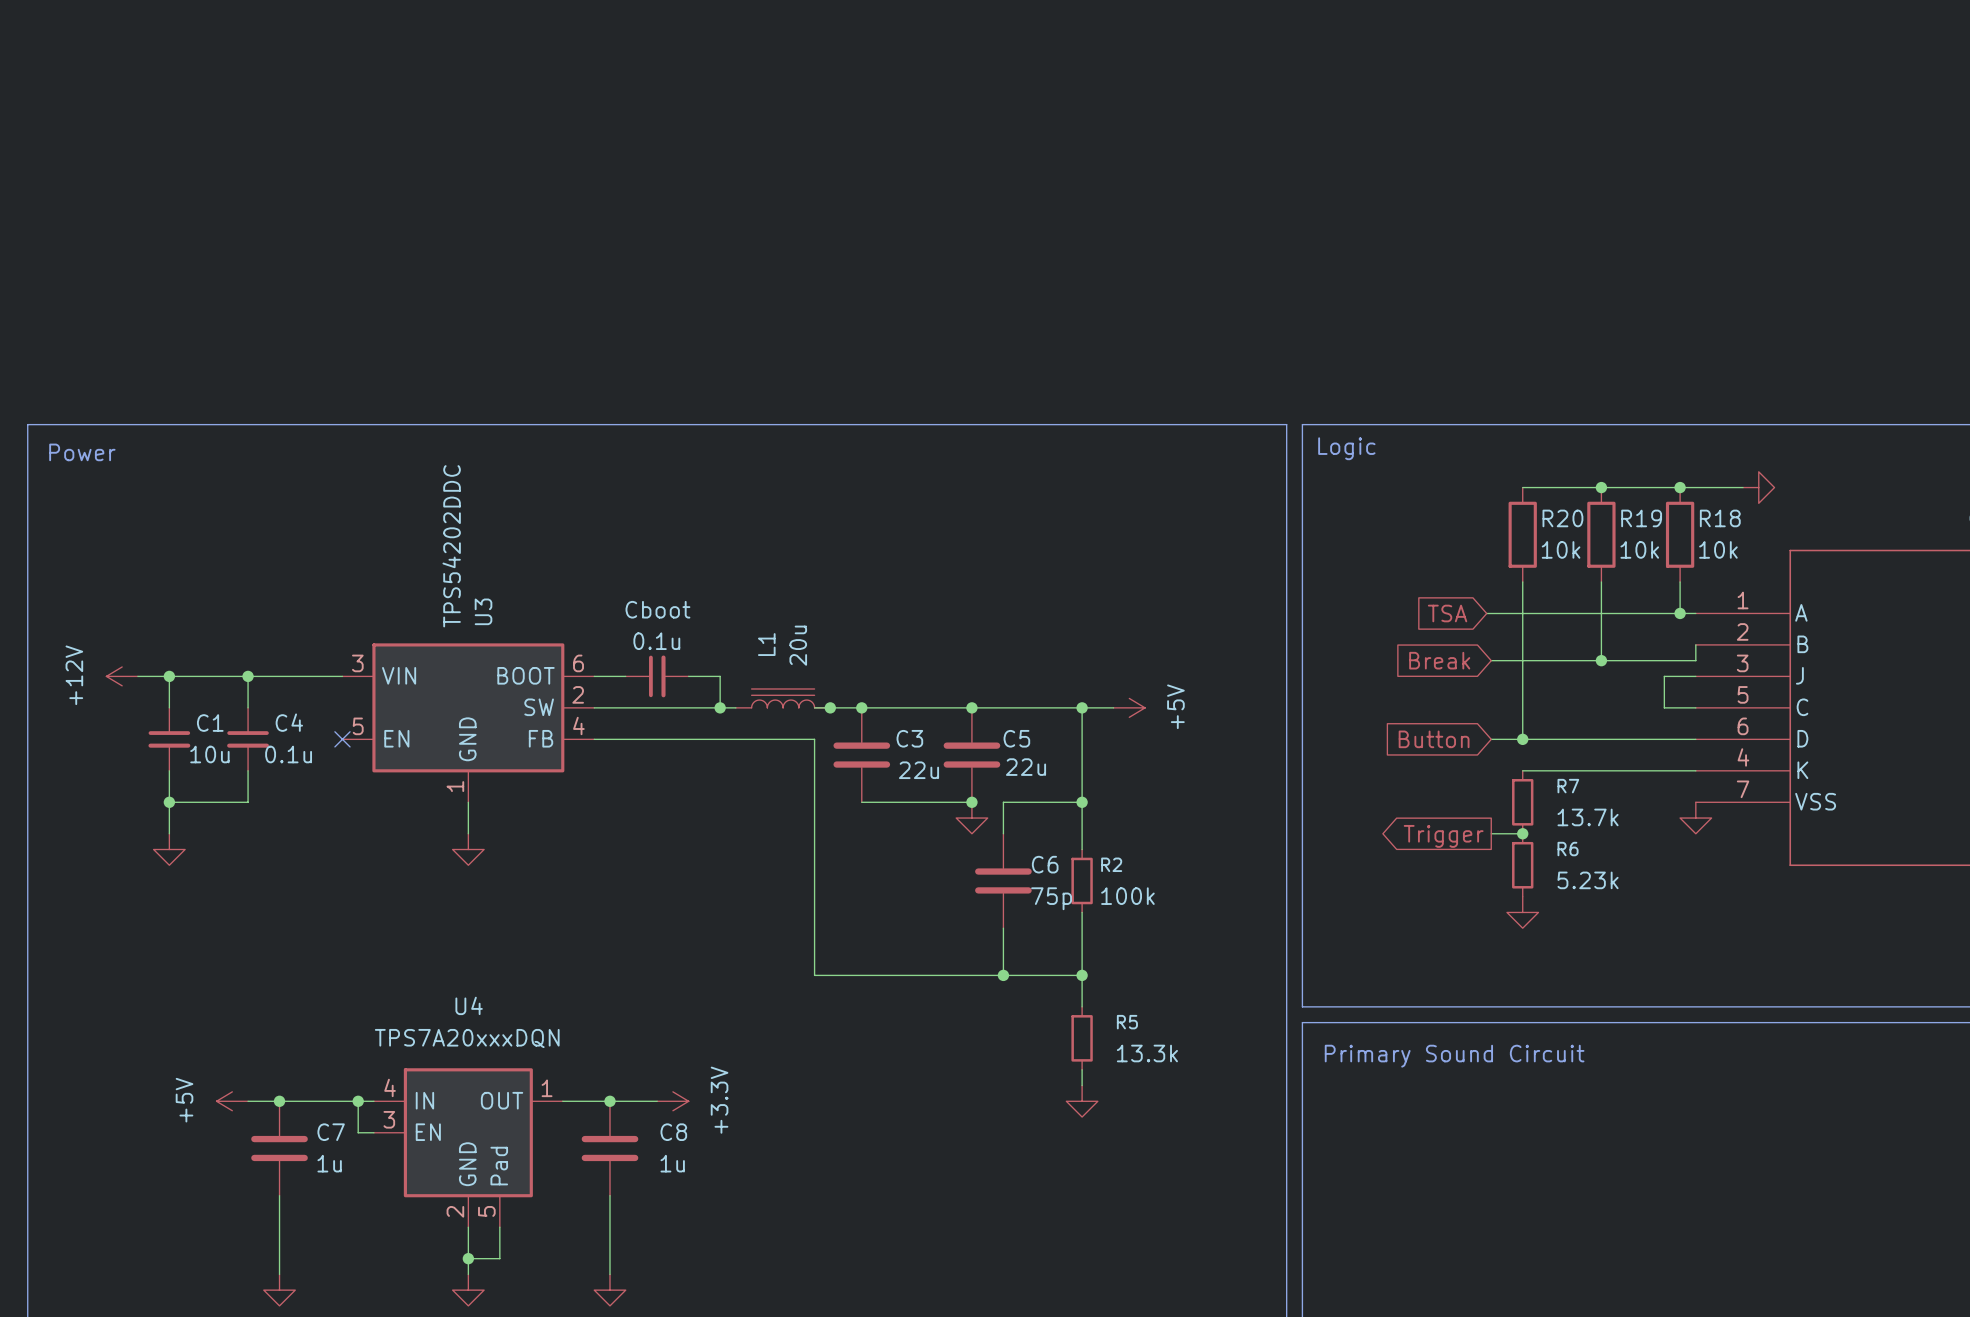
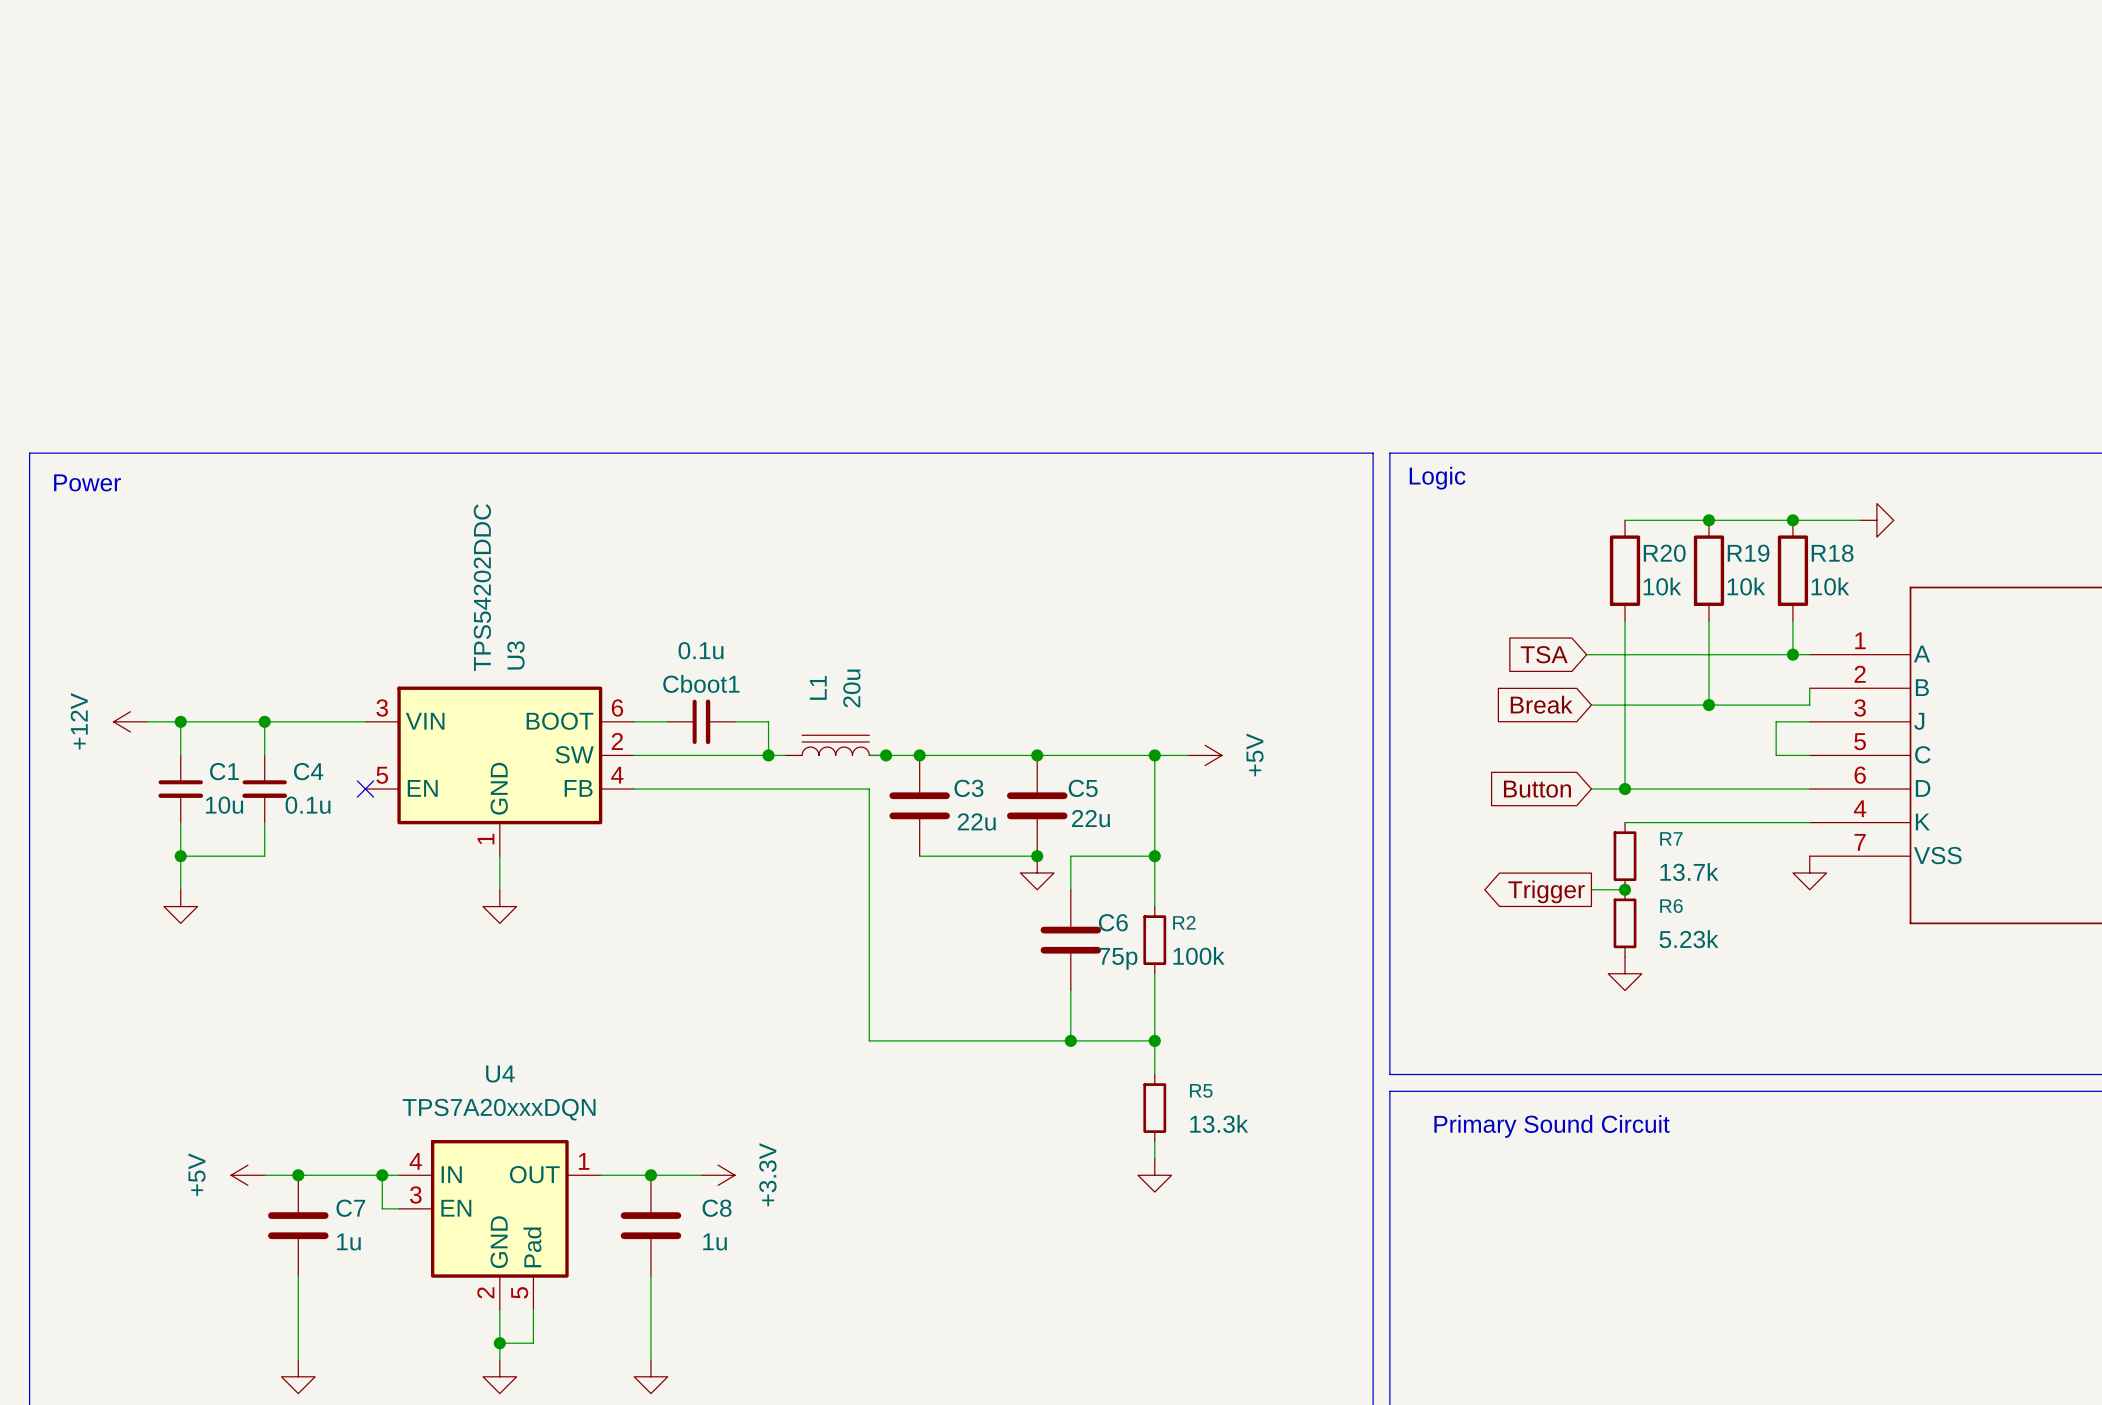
0.1u value: Cboot (657, 609) -> 0.1u (701, 650)
0.1u name: 0.1u (656, 641) -> Cboot1 (701, 683)

